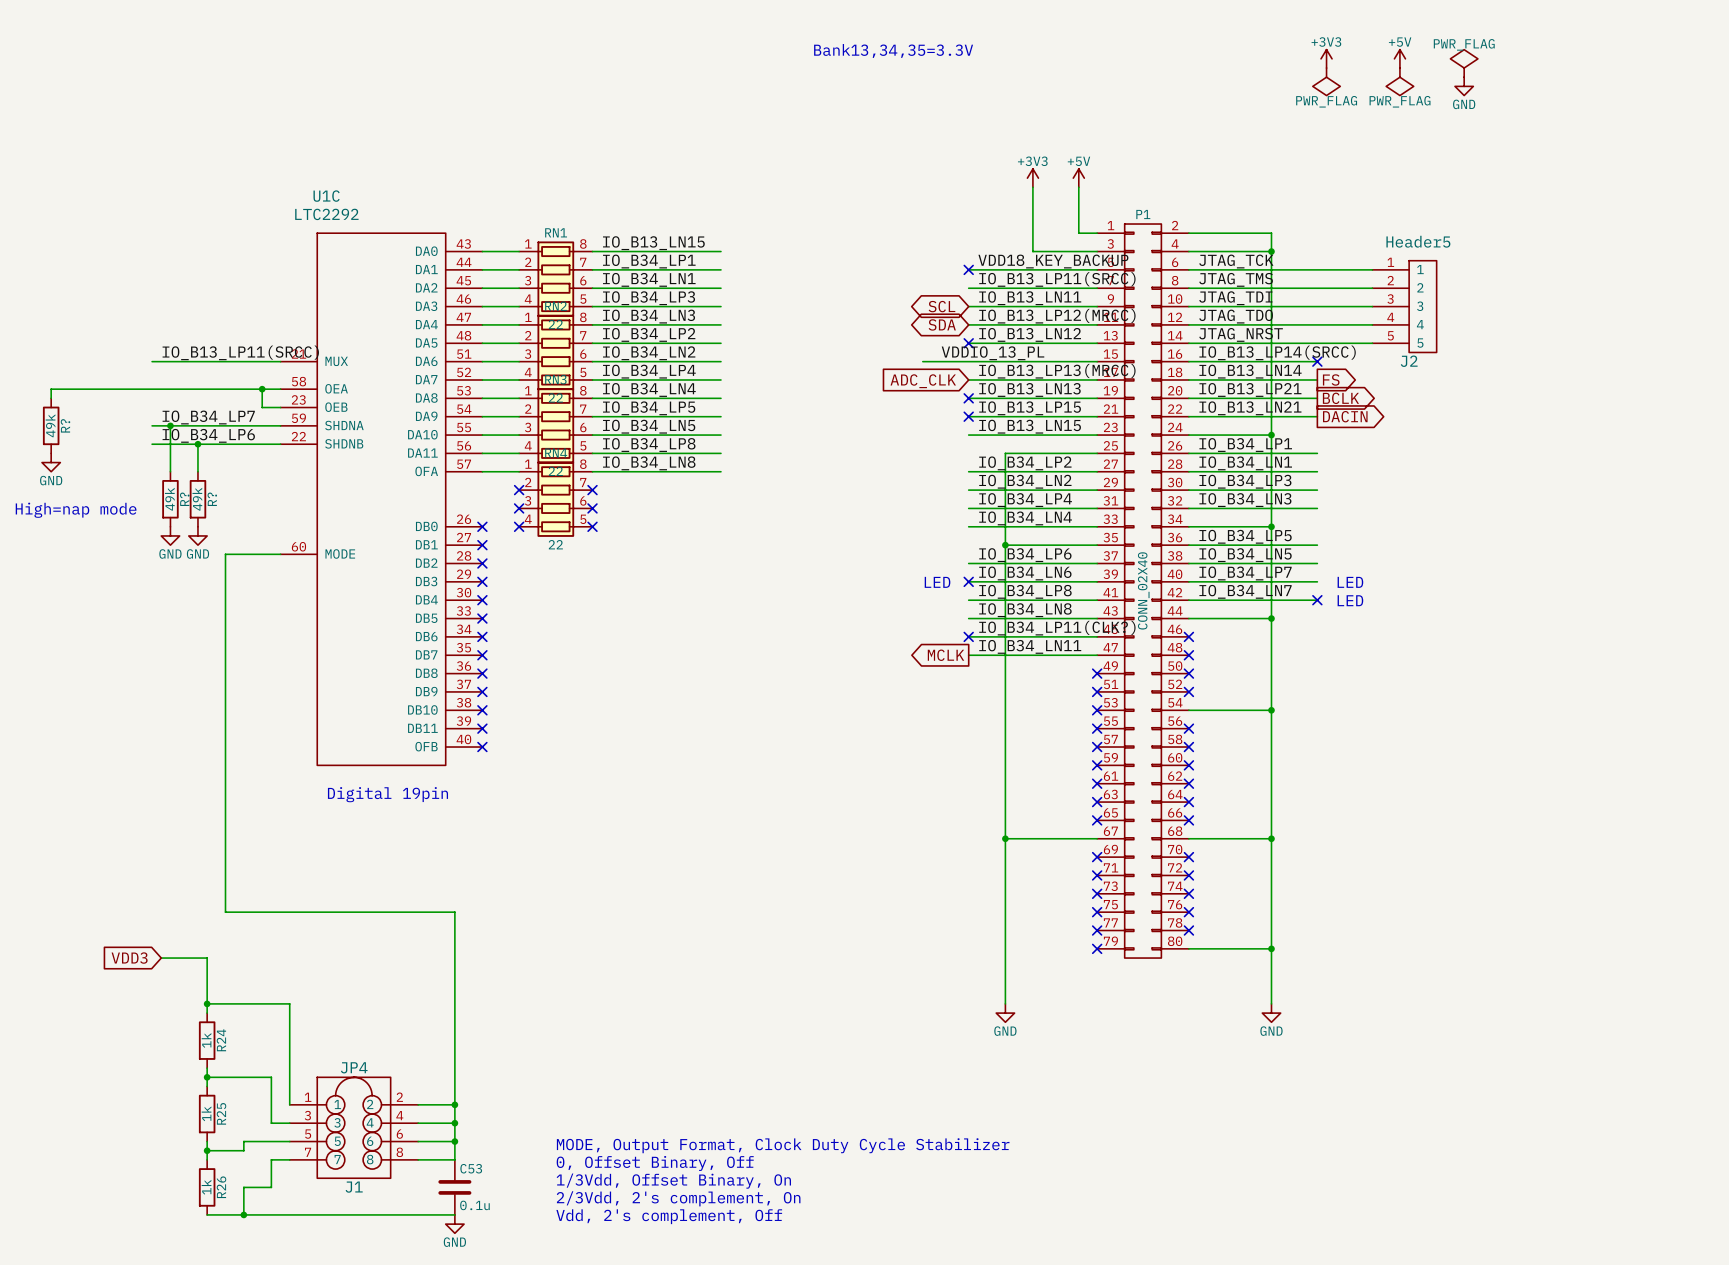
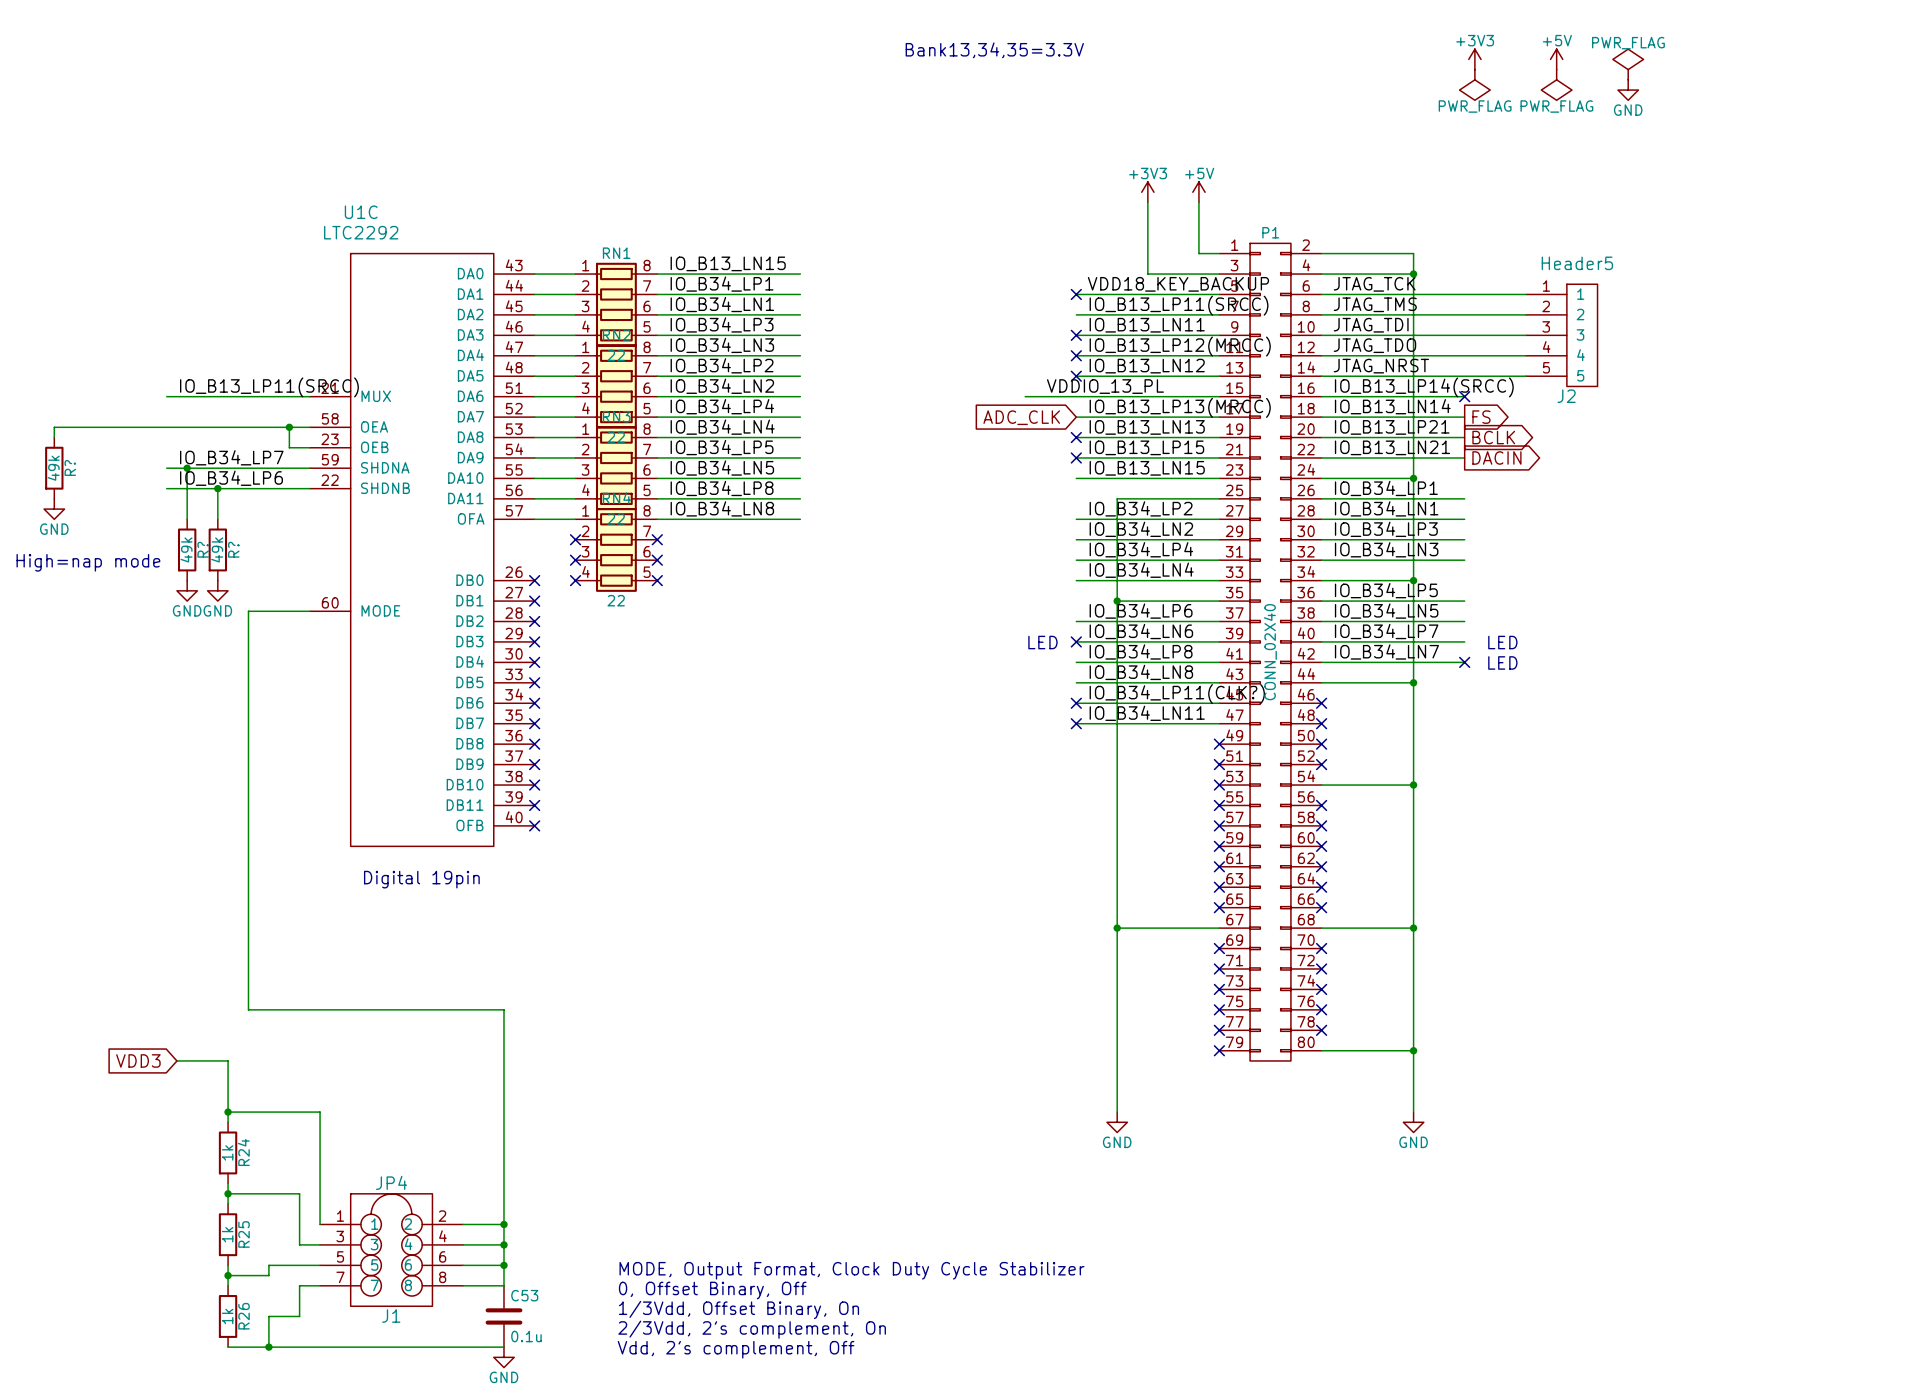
global label: SCL (941, 306) -> none
no-connect mark: none -> (1076, 335)
global label: SDA (942, 324) -> none
no-connect mark: none -> (1076, 355)
global label: MCLK (946, 655) -> none
no-connect mark: none -> (1076, 723)

